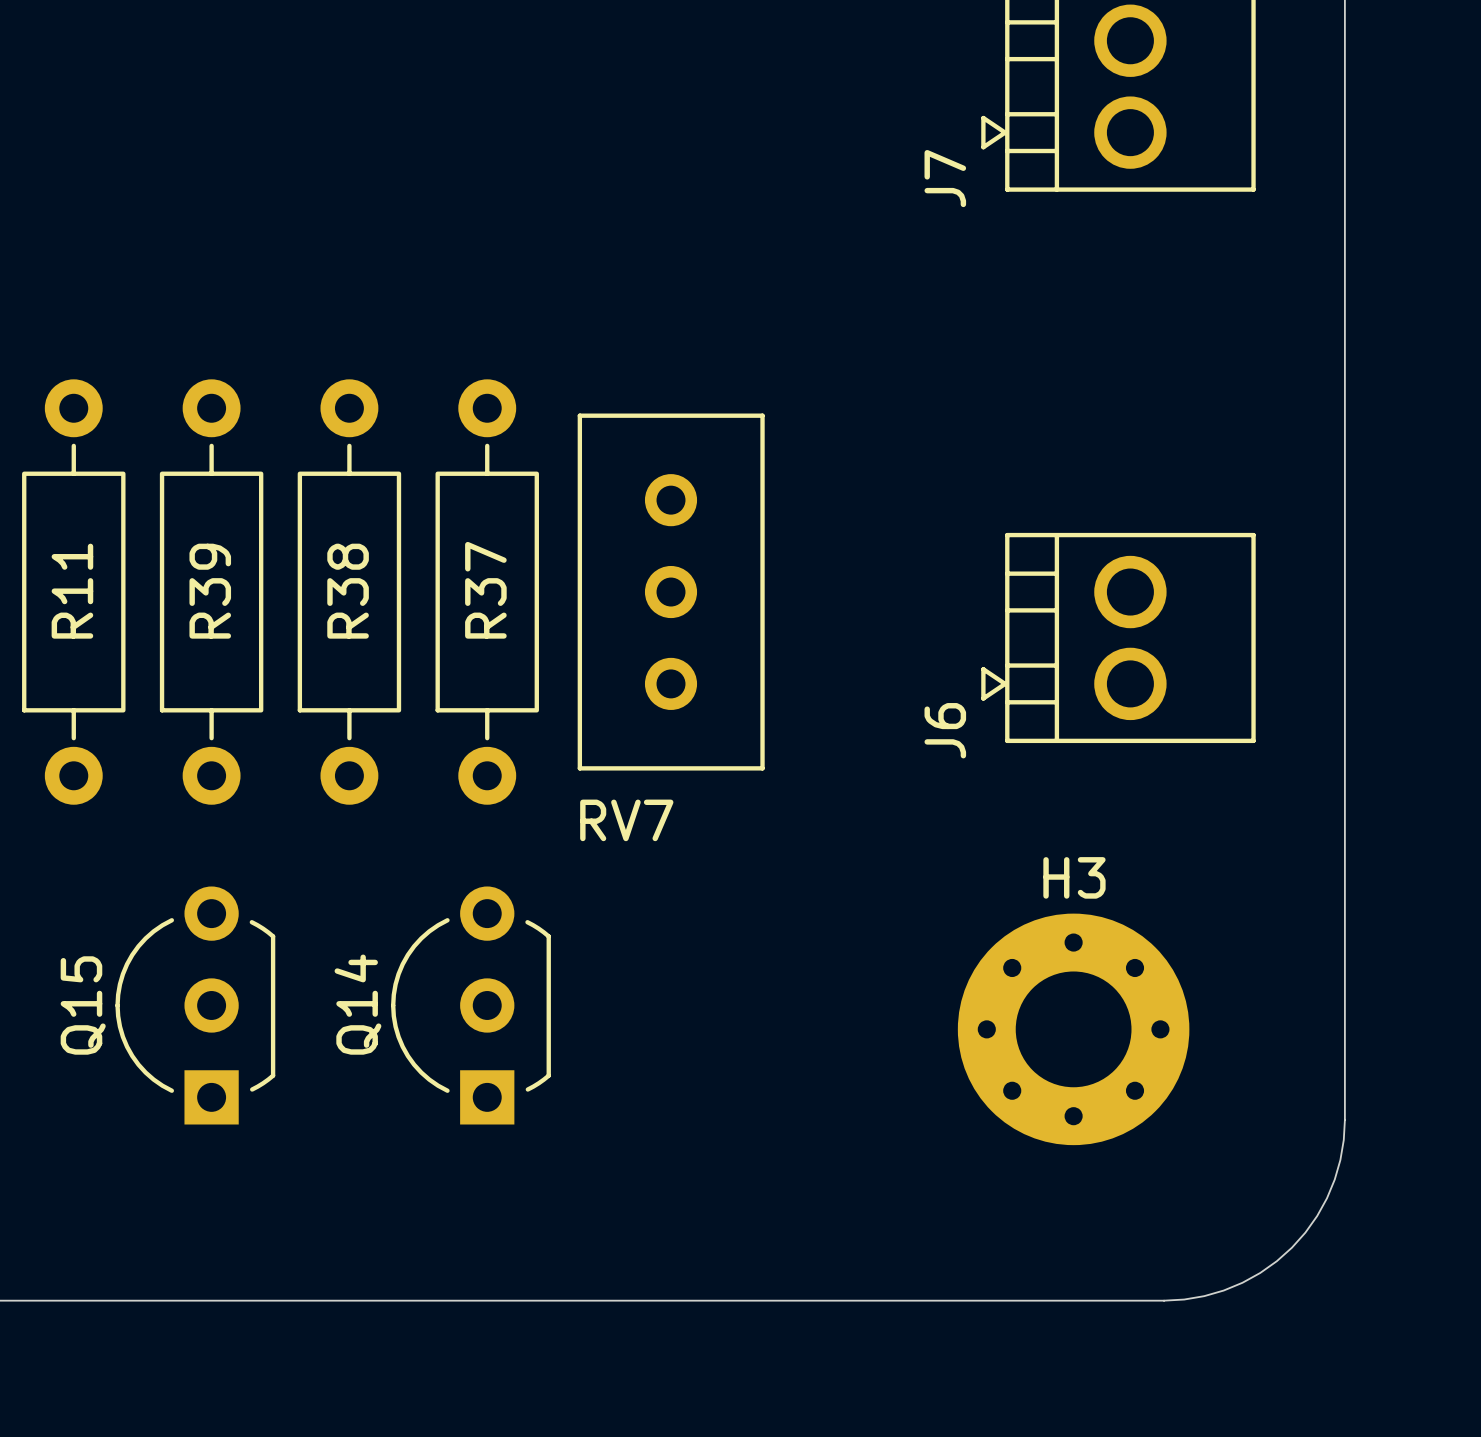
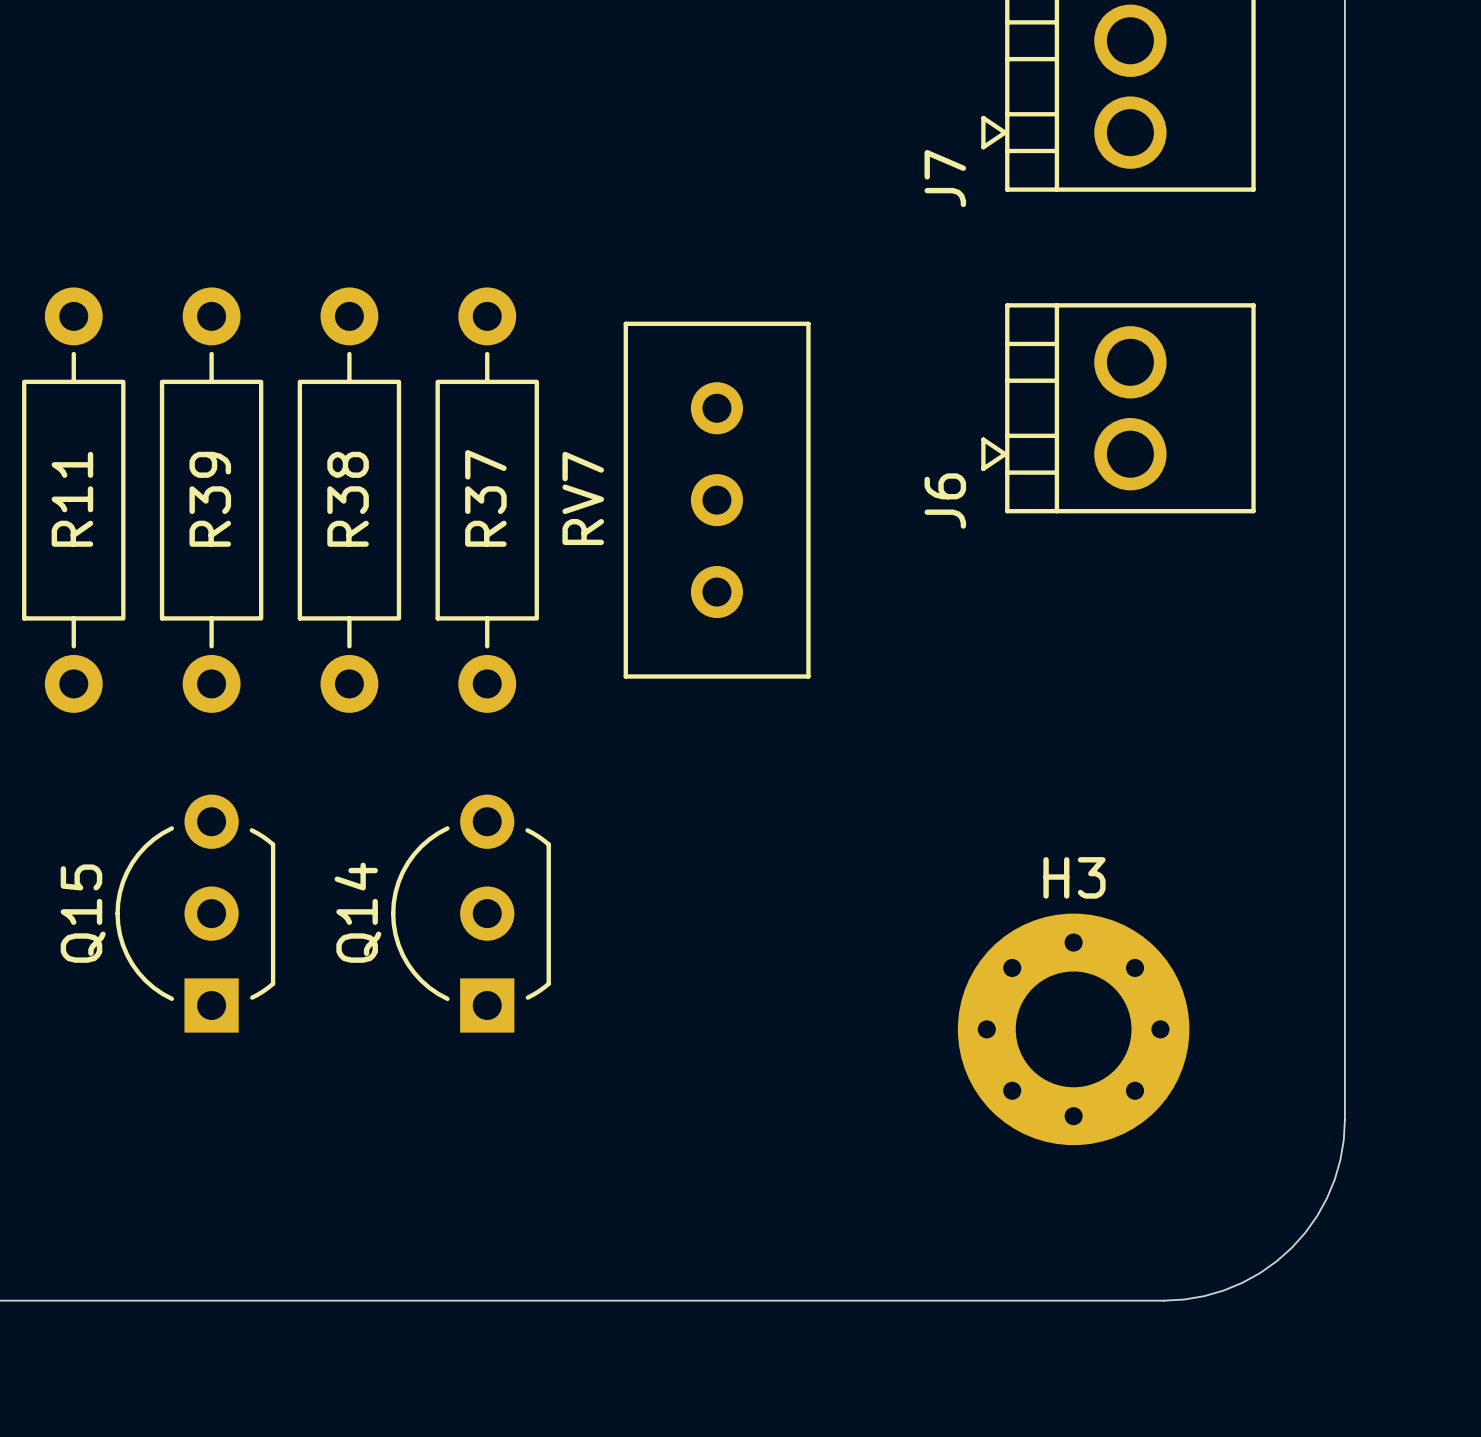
R11 position: (73, 592) -> (73, 500)
R39 position: (211, 592) -> (211, 500)
R38 position: (349, 592) -> (349, 500)
R37 position: (487, 592) -> (487, 500)
RV7 position: (671, 592) -> (717, 500)
J6 position: (1118, 637) -> (1118, 408)
RV7 name rotation: 0° (626, 820) -> 90° counterclockwise (583, 498)
RV7 name position: RV7 (626, 820) -> RV7 (583, 498)
Q15 position: (195, 1005) -> (195, 913)
Q14 position: (470, 1005) -> (470, 913)

